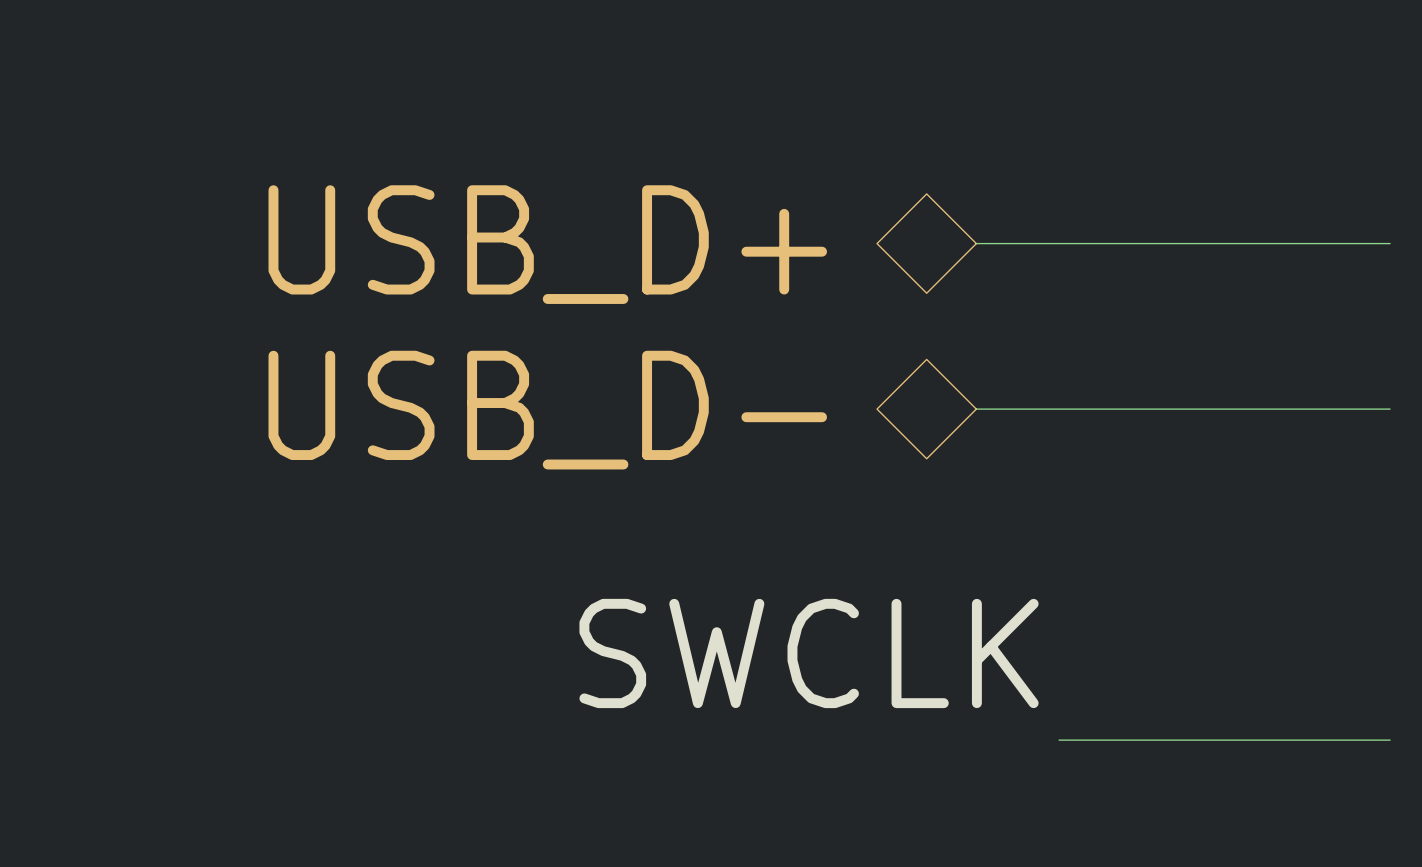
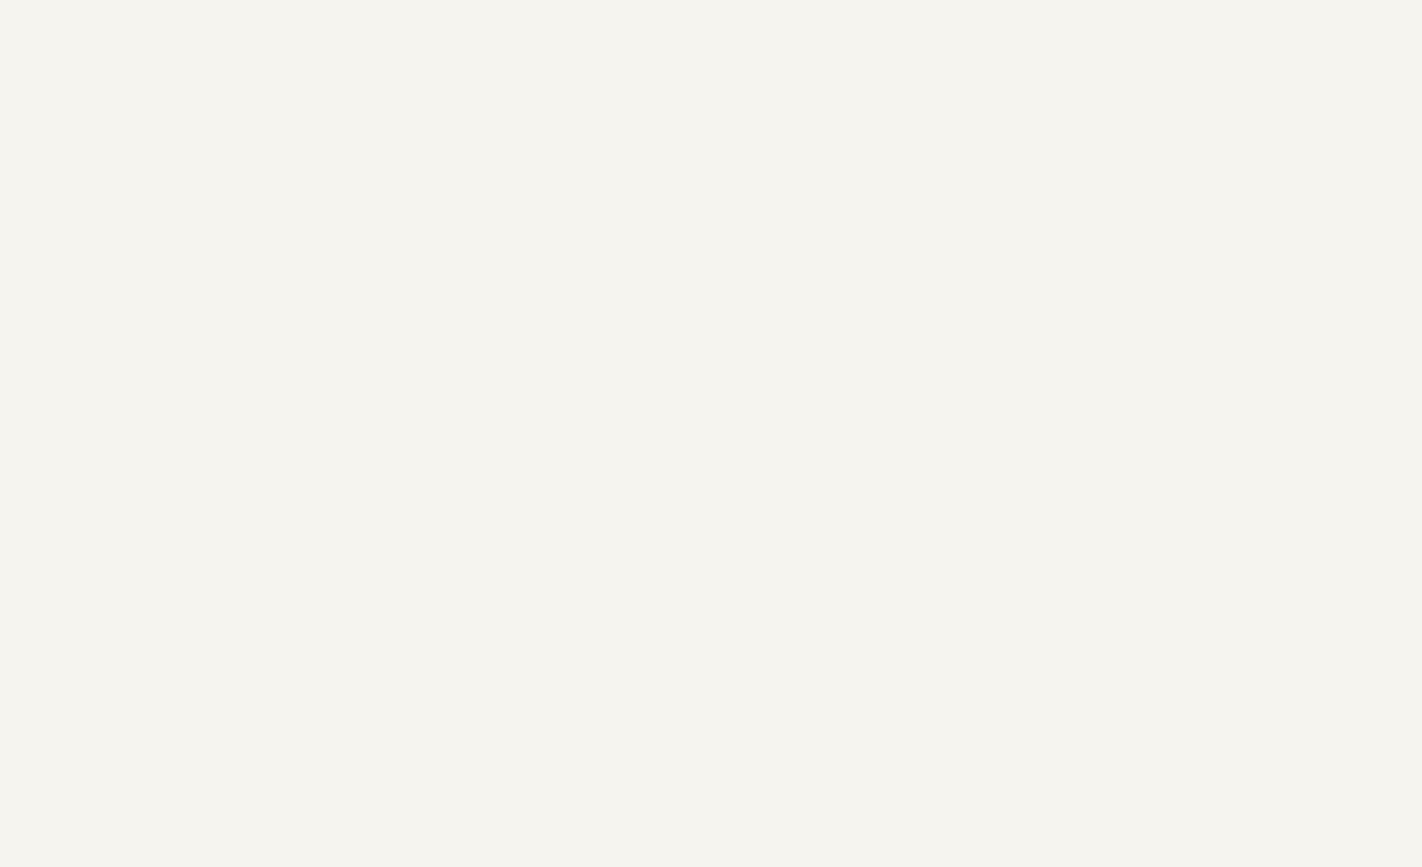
wire: (976, 243) (1390, 243) -> none
hierarchical label: USB_D+ (547, 244) -> none
wire: (976, 409) (1390, 409) -> none
hierarchical label: USB_D- (547, 410) -> none
label: SWCLK (809, 653) -> none
wire: (1059, 740) (1390, 740) -> none

